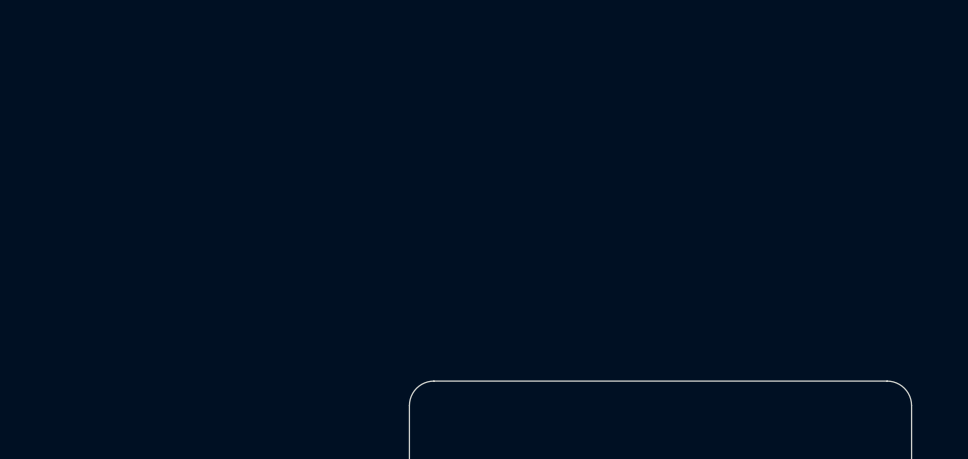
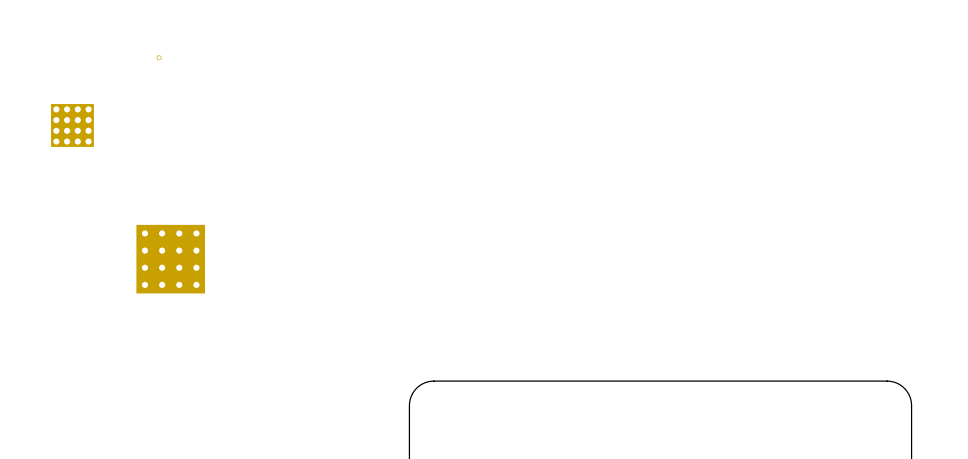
part: none -> (159, 57)
part: none -> (72, 125)
part: none -> (170, 259)

